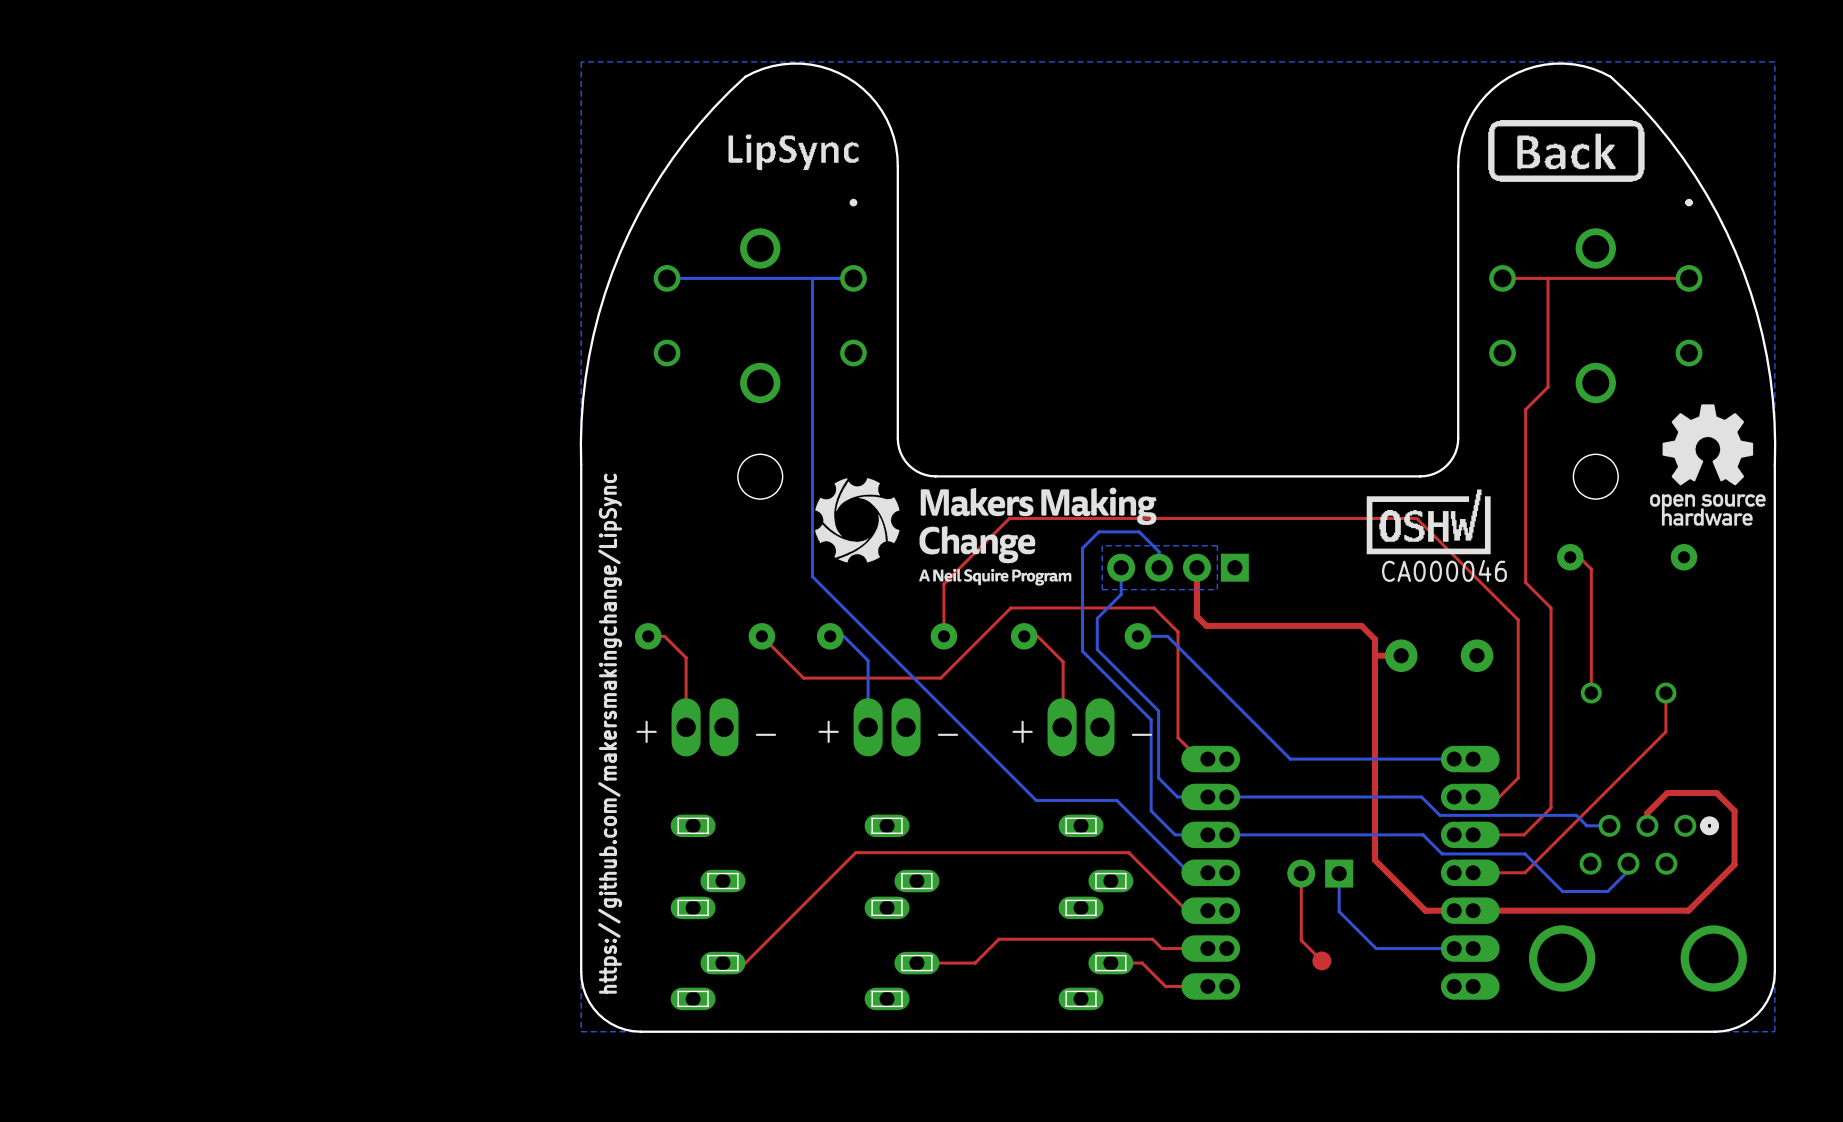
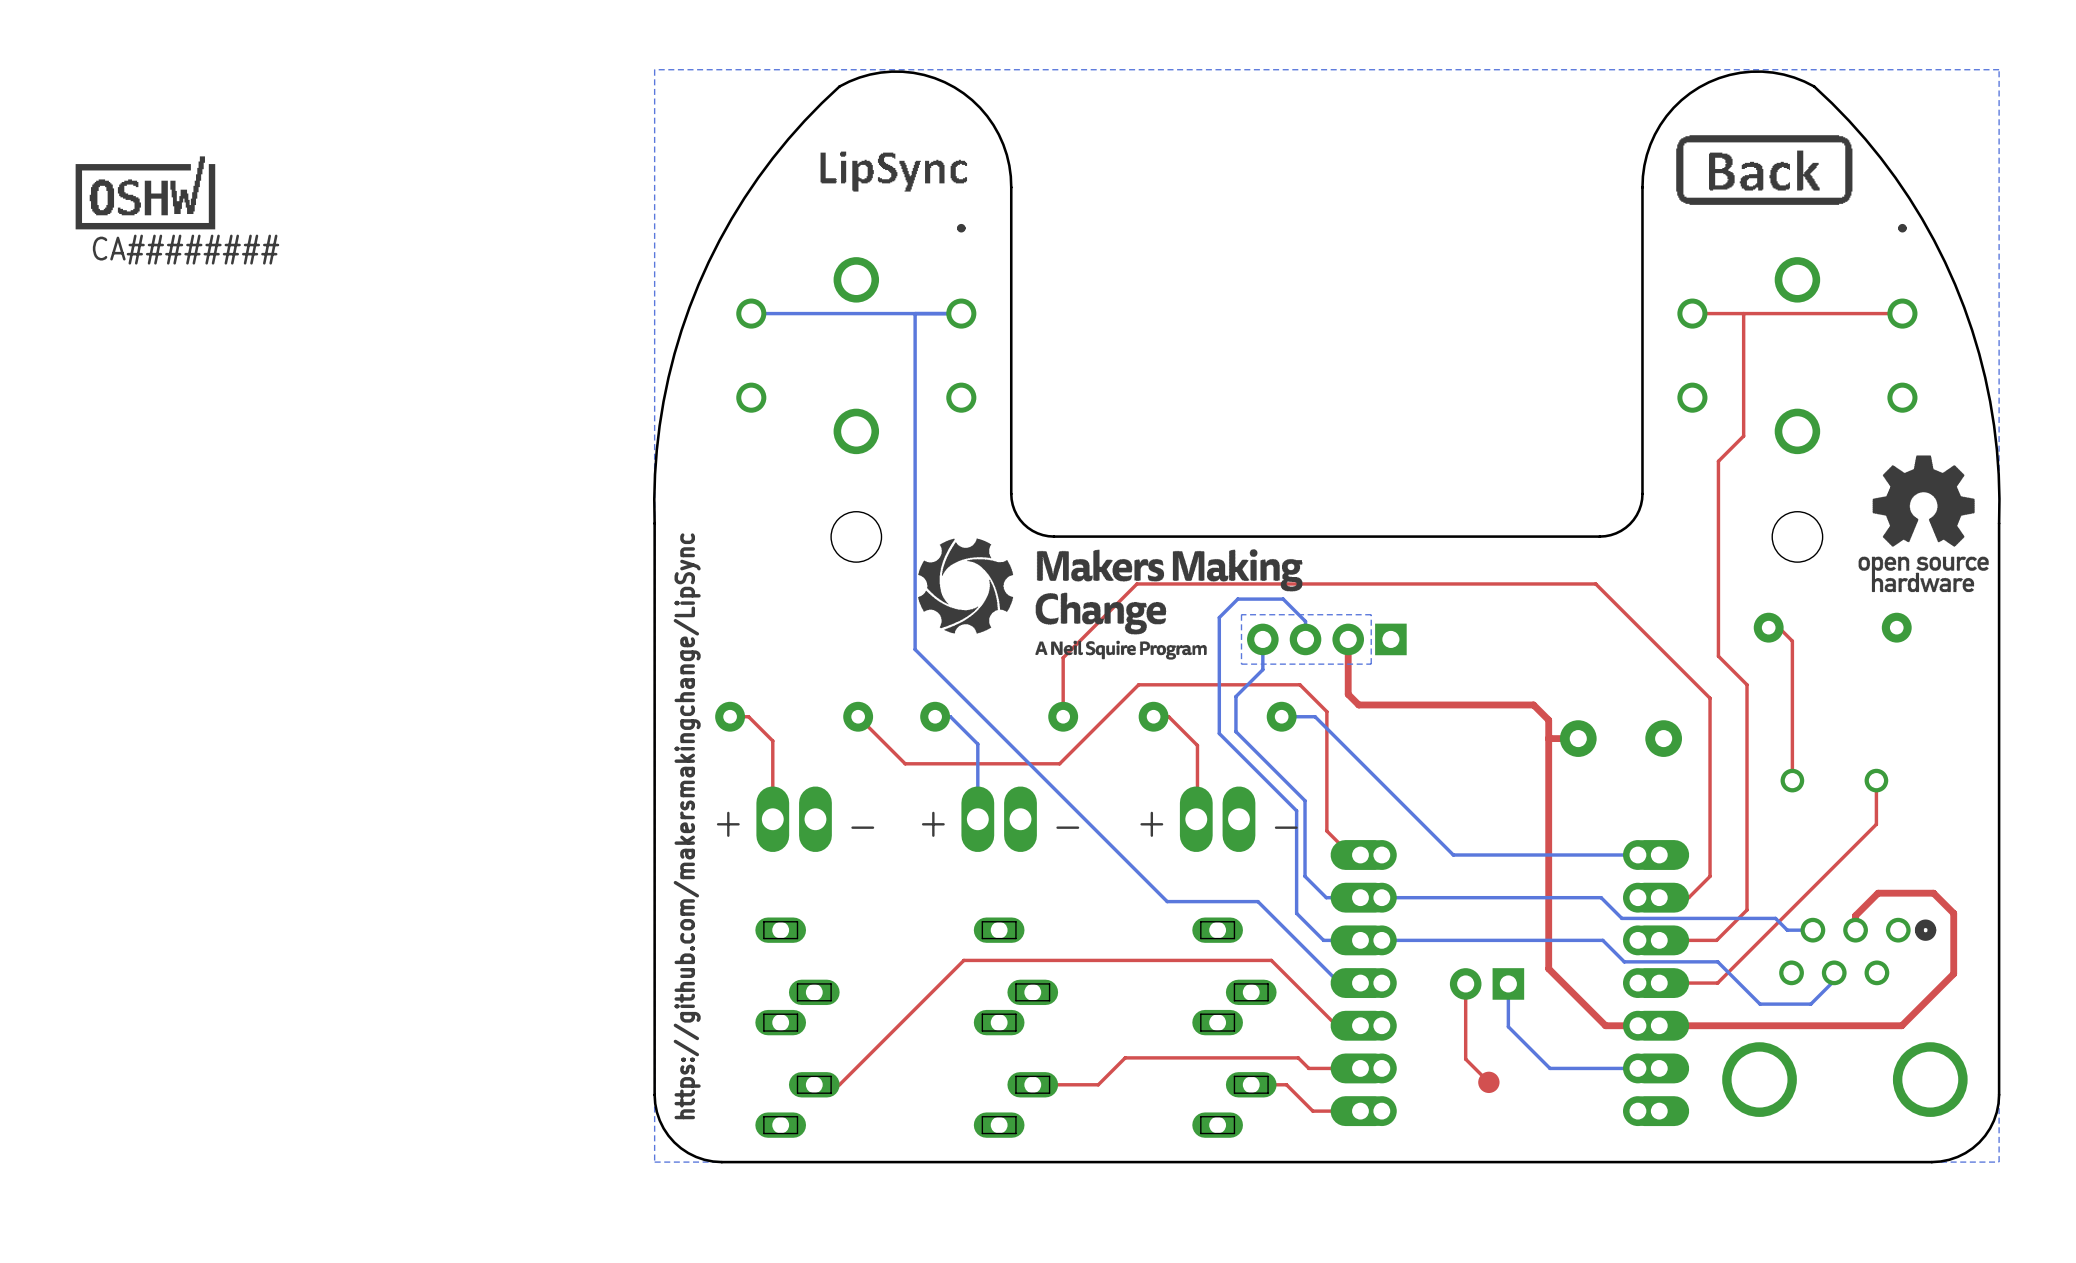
drawing: none -> [75, 156, 216, 230]
drawing: [1366, 489, 1491, 555] -> none

